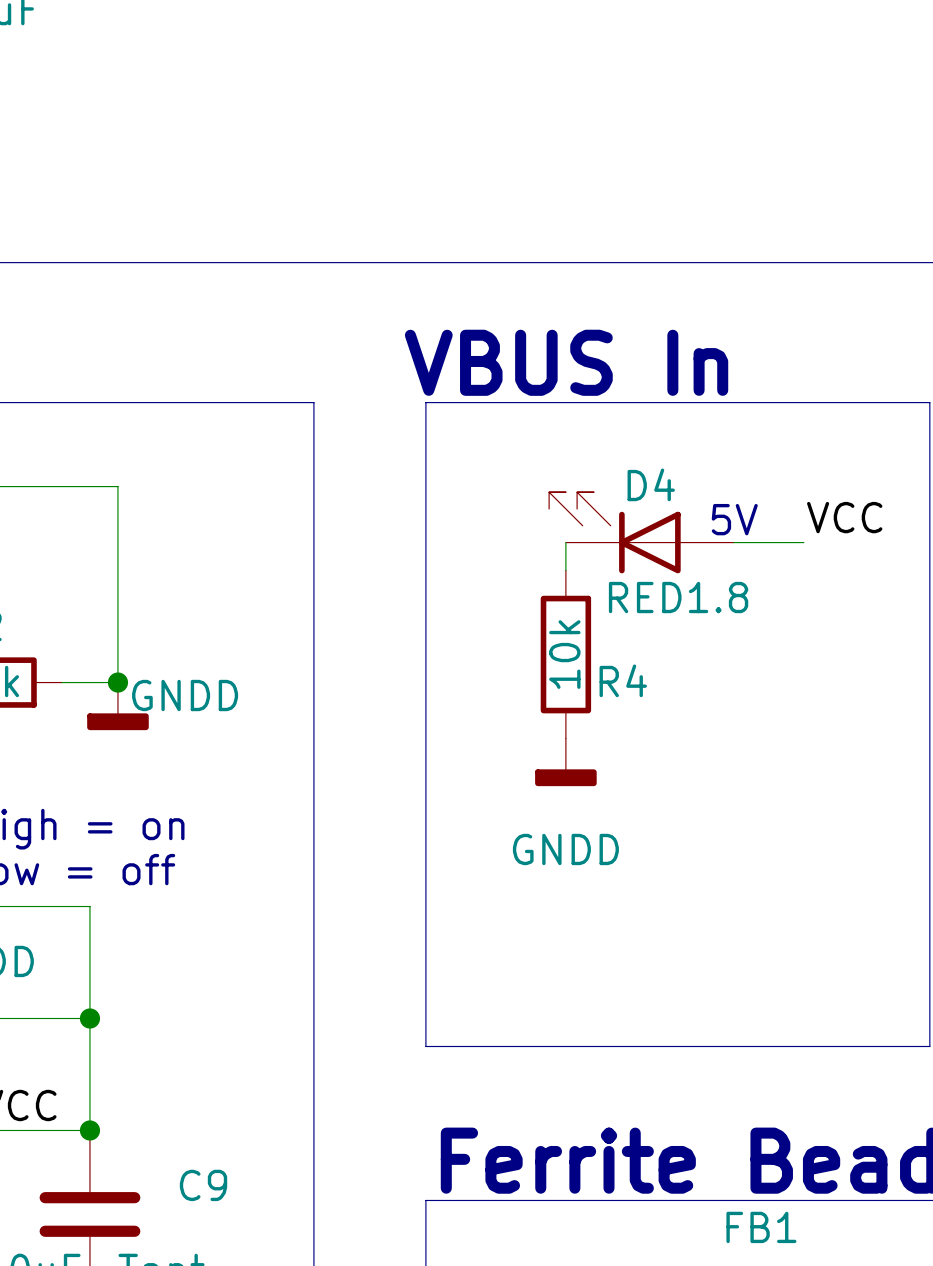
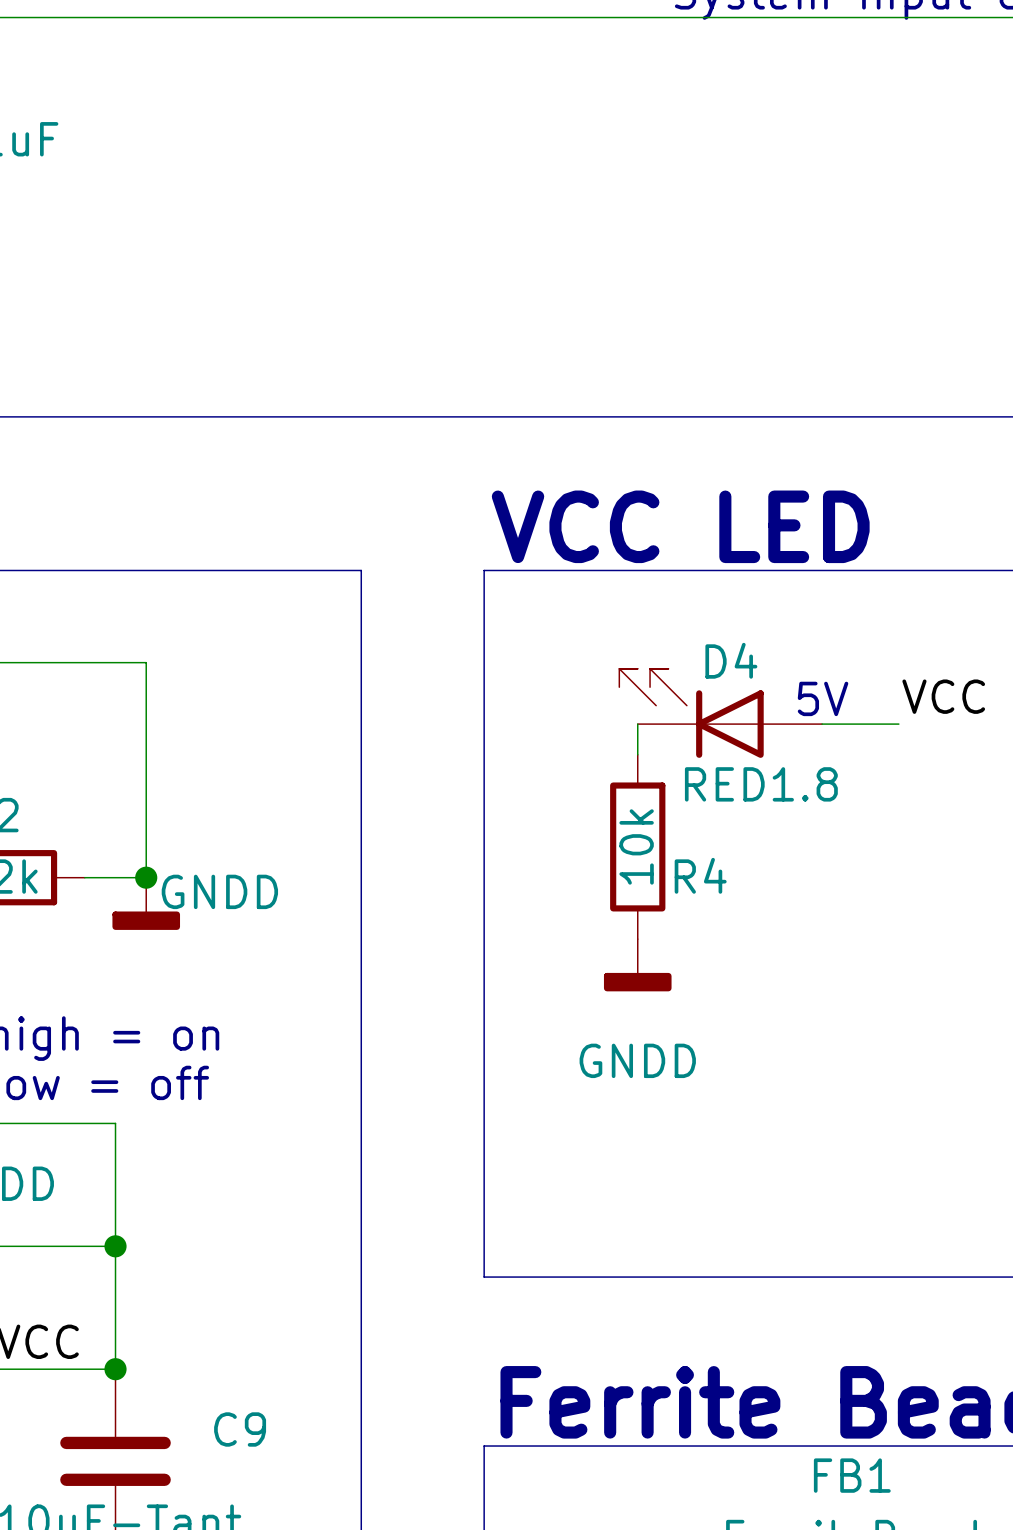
text: VBUS In (566, 362) -> none
text: none -> VCC LED (680, 526)

